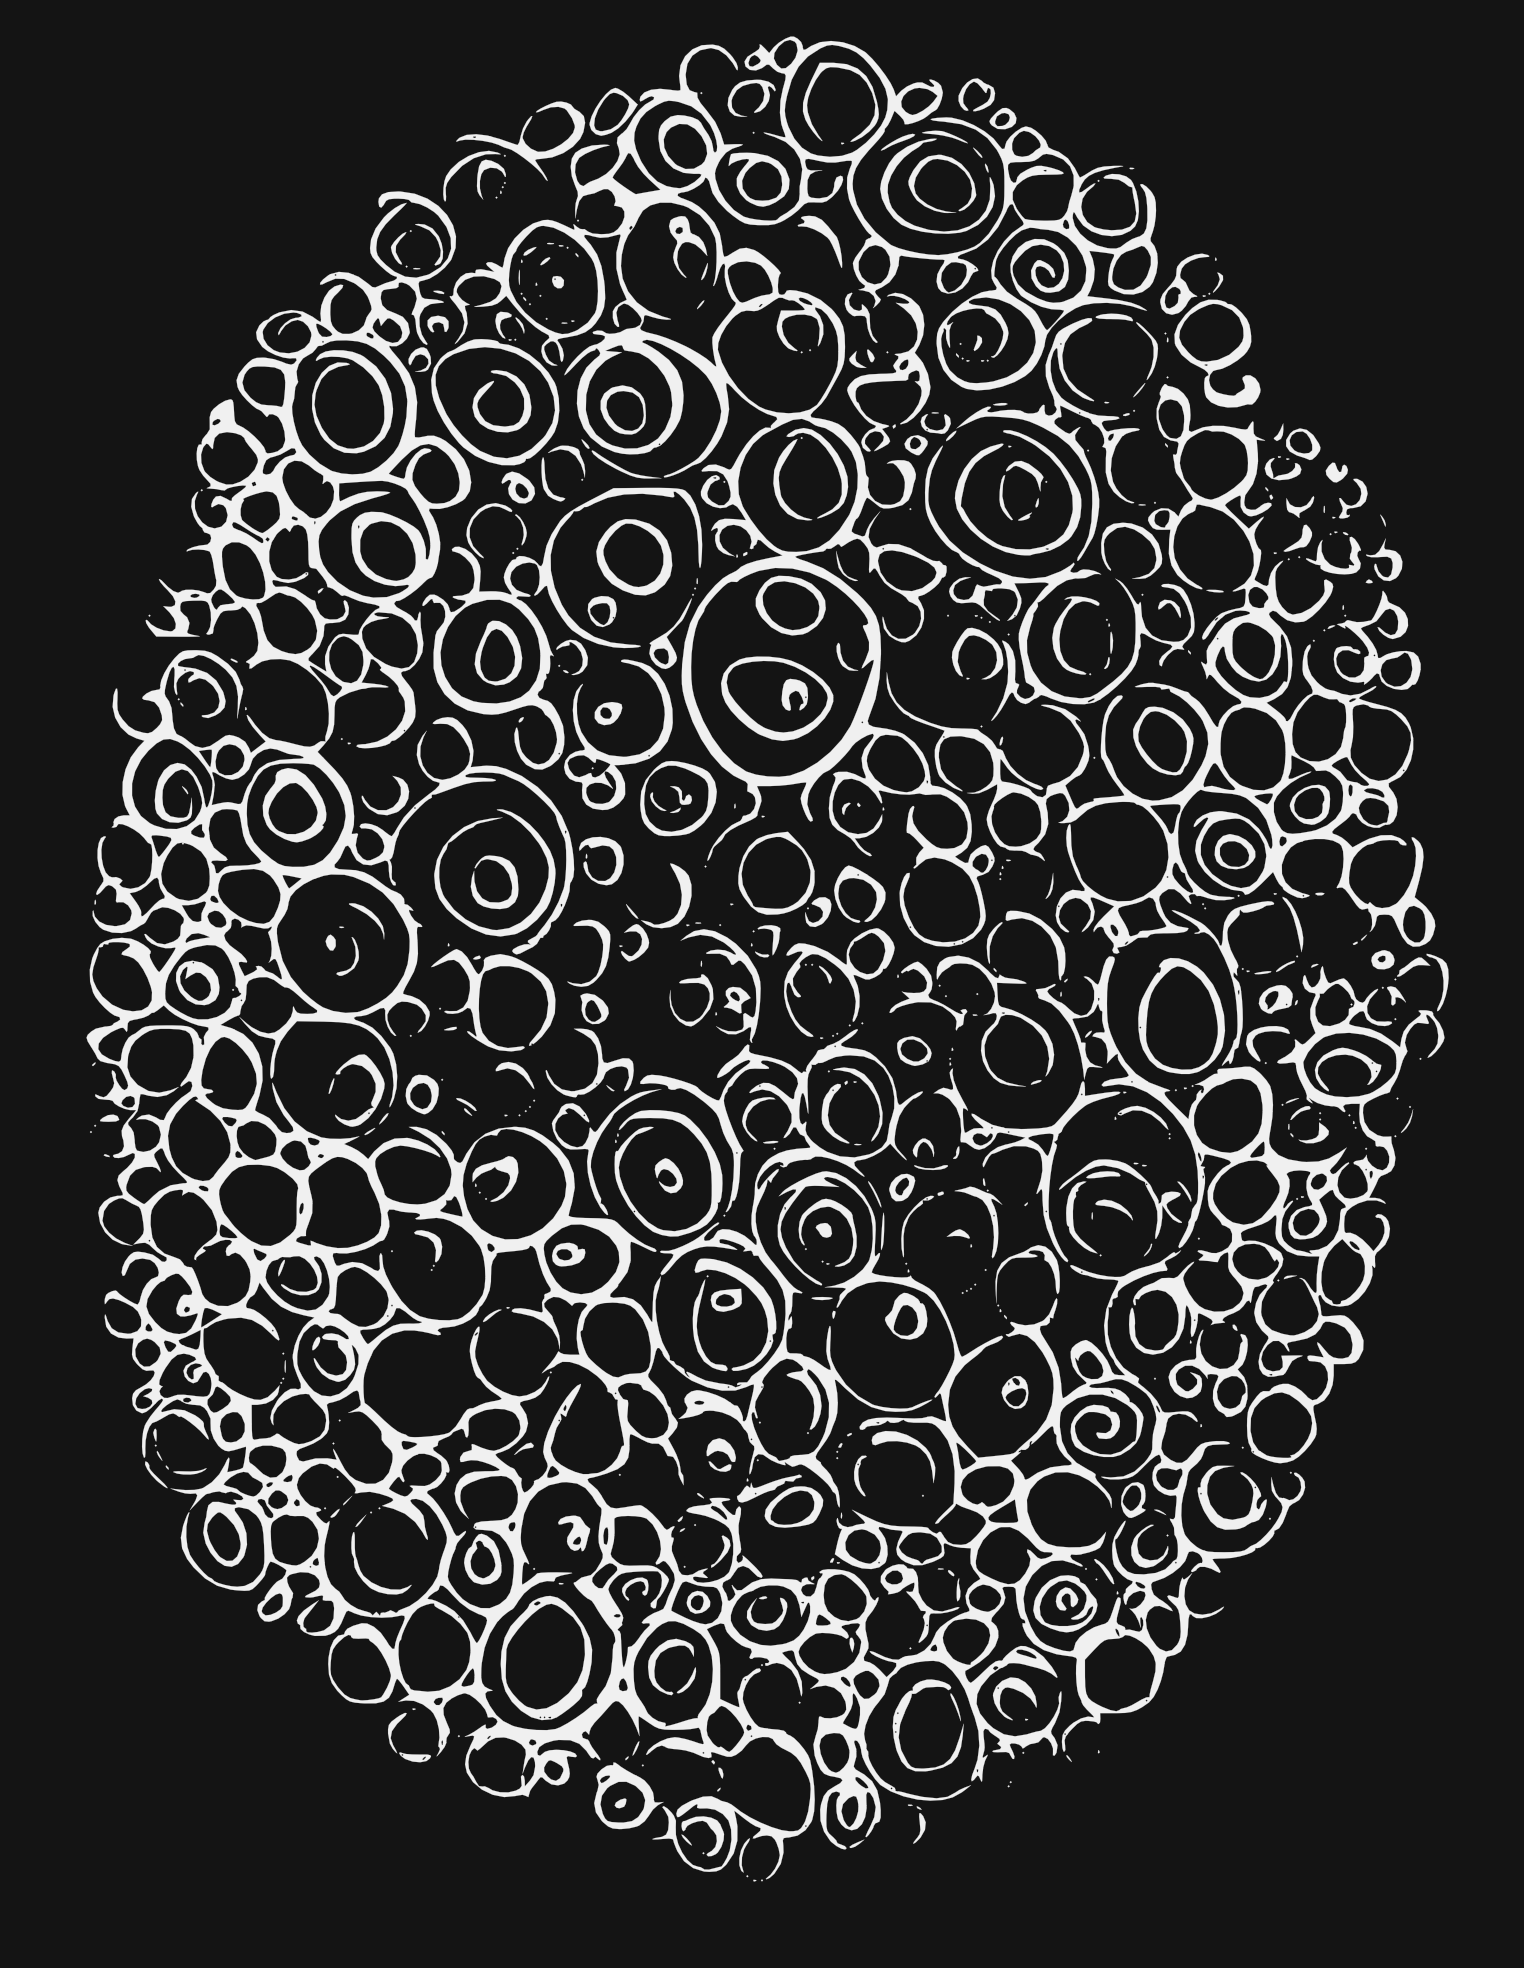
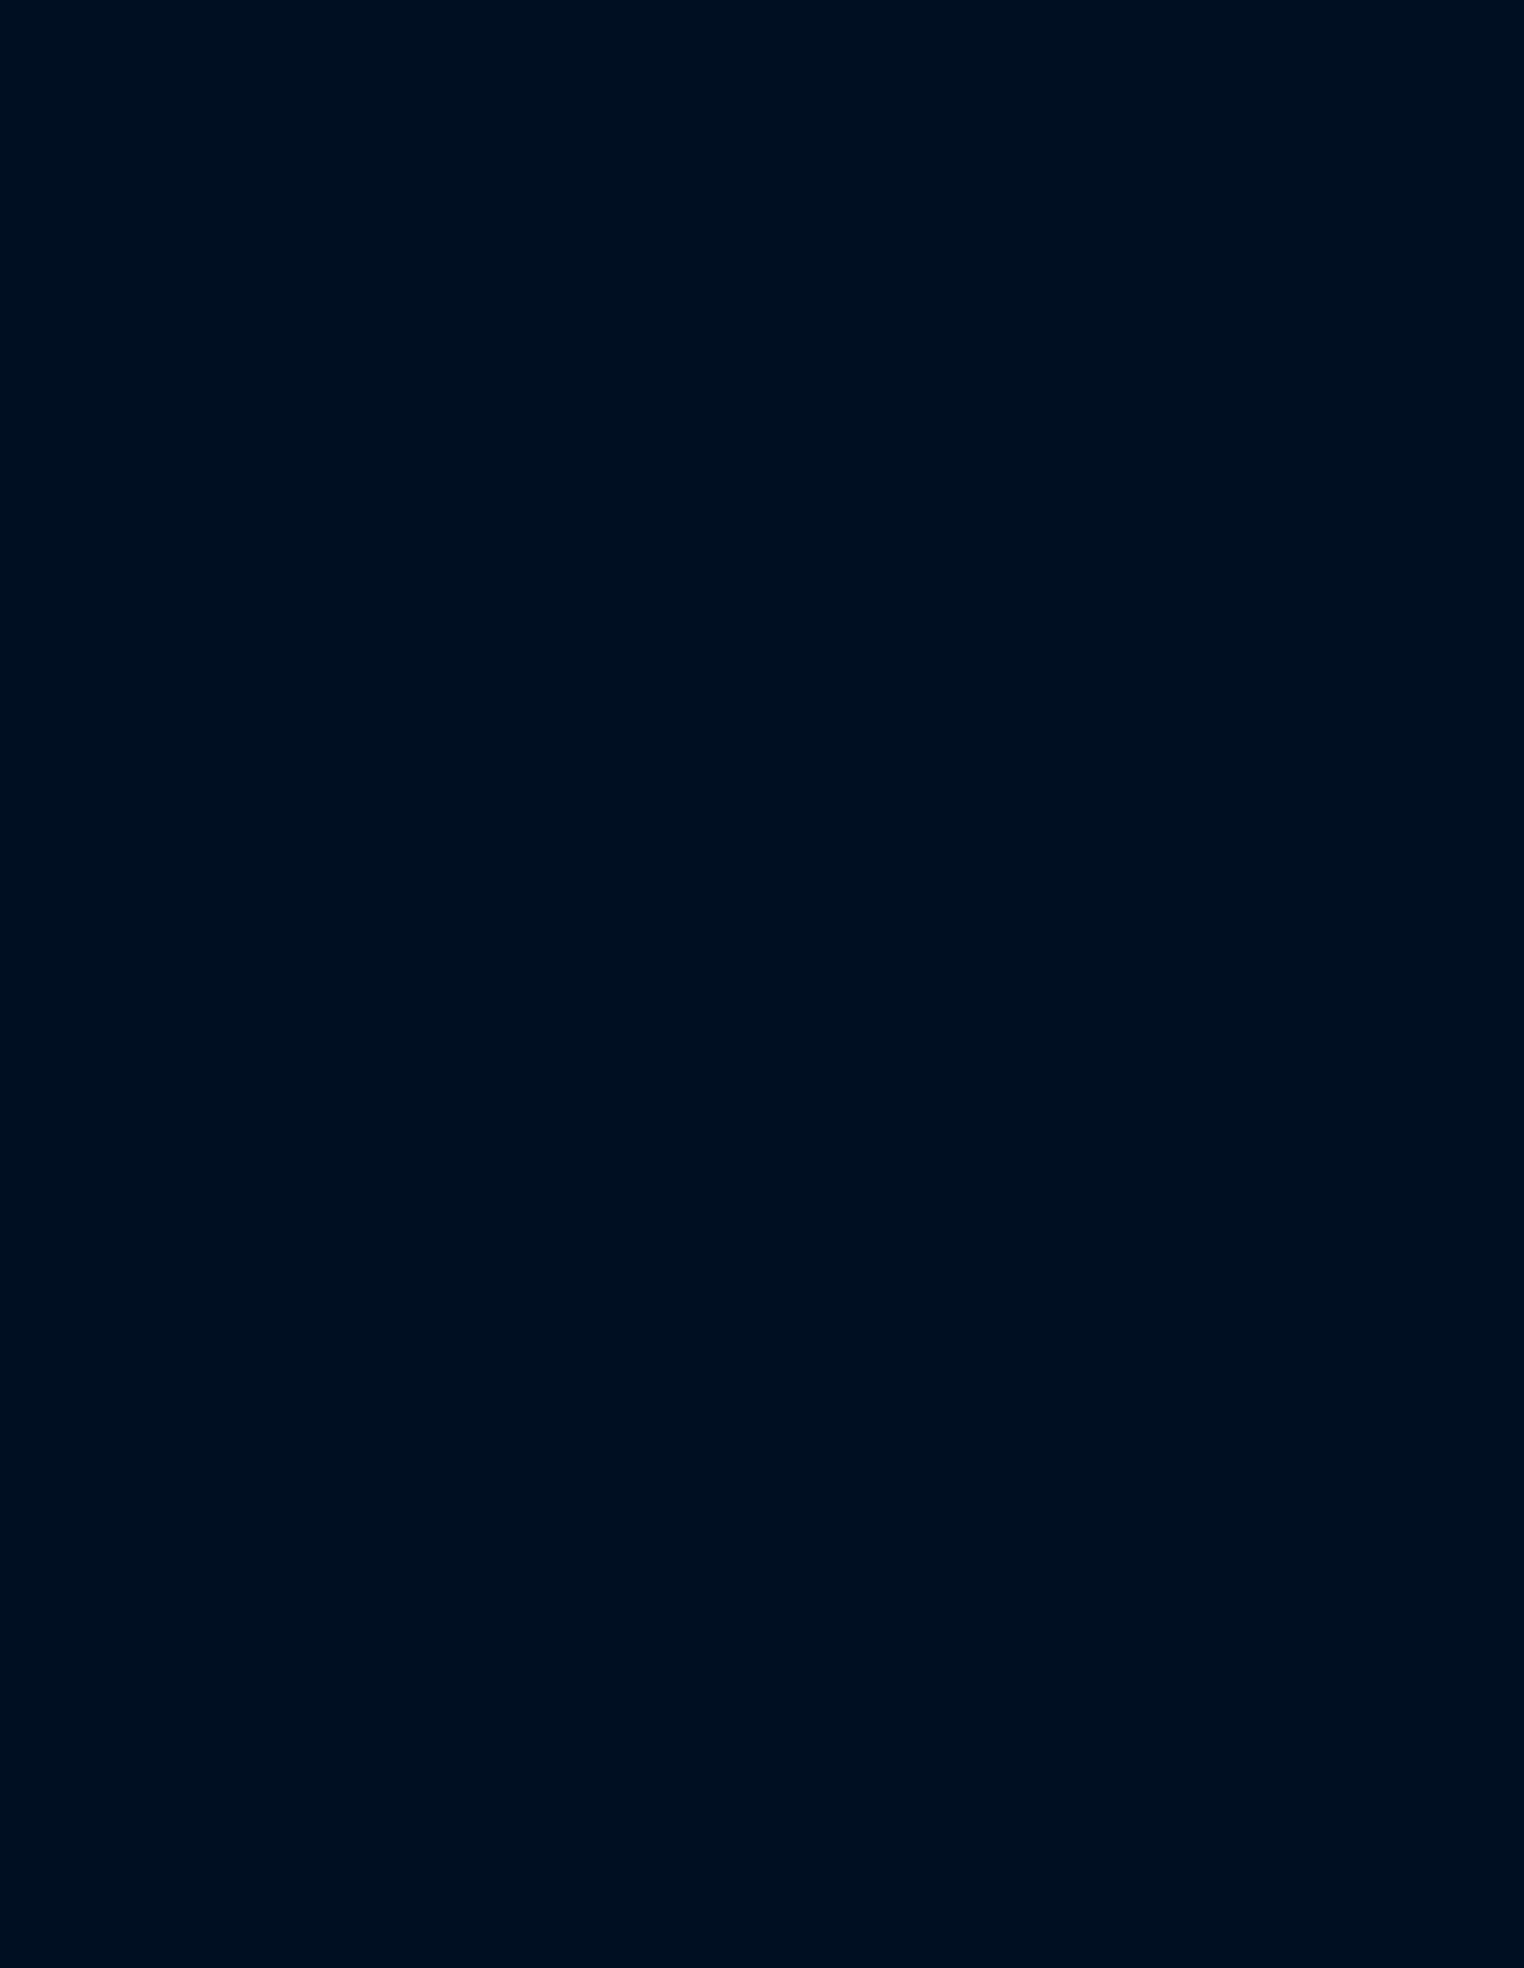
drawing: [86, 36, 1449, 1882] -> none

